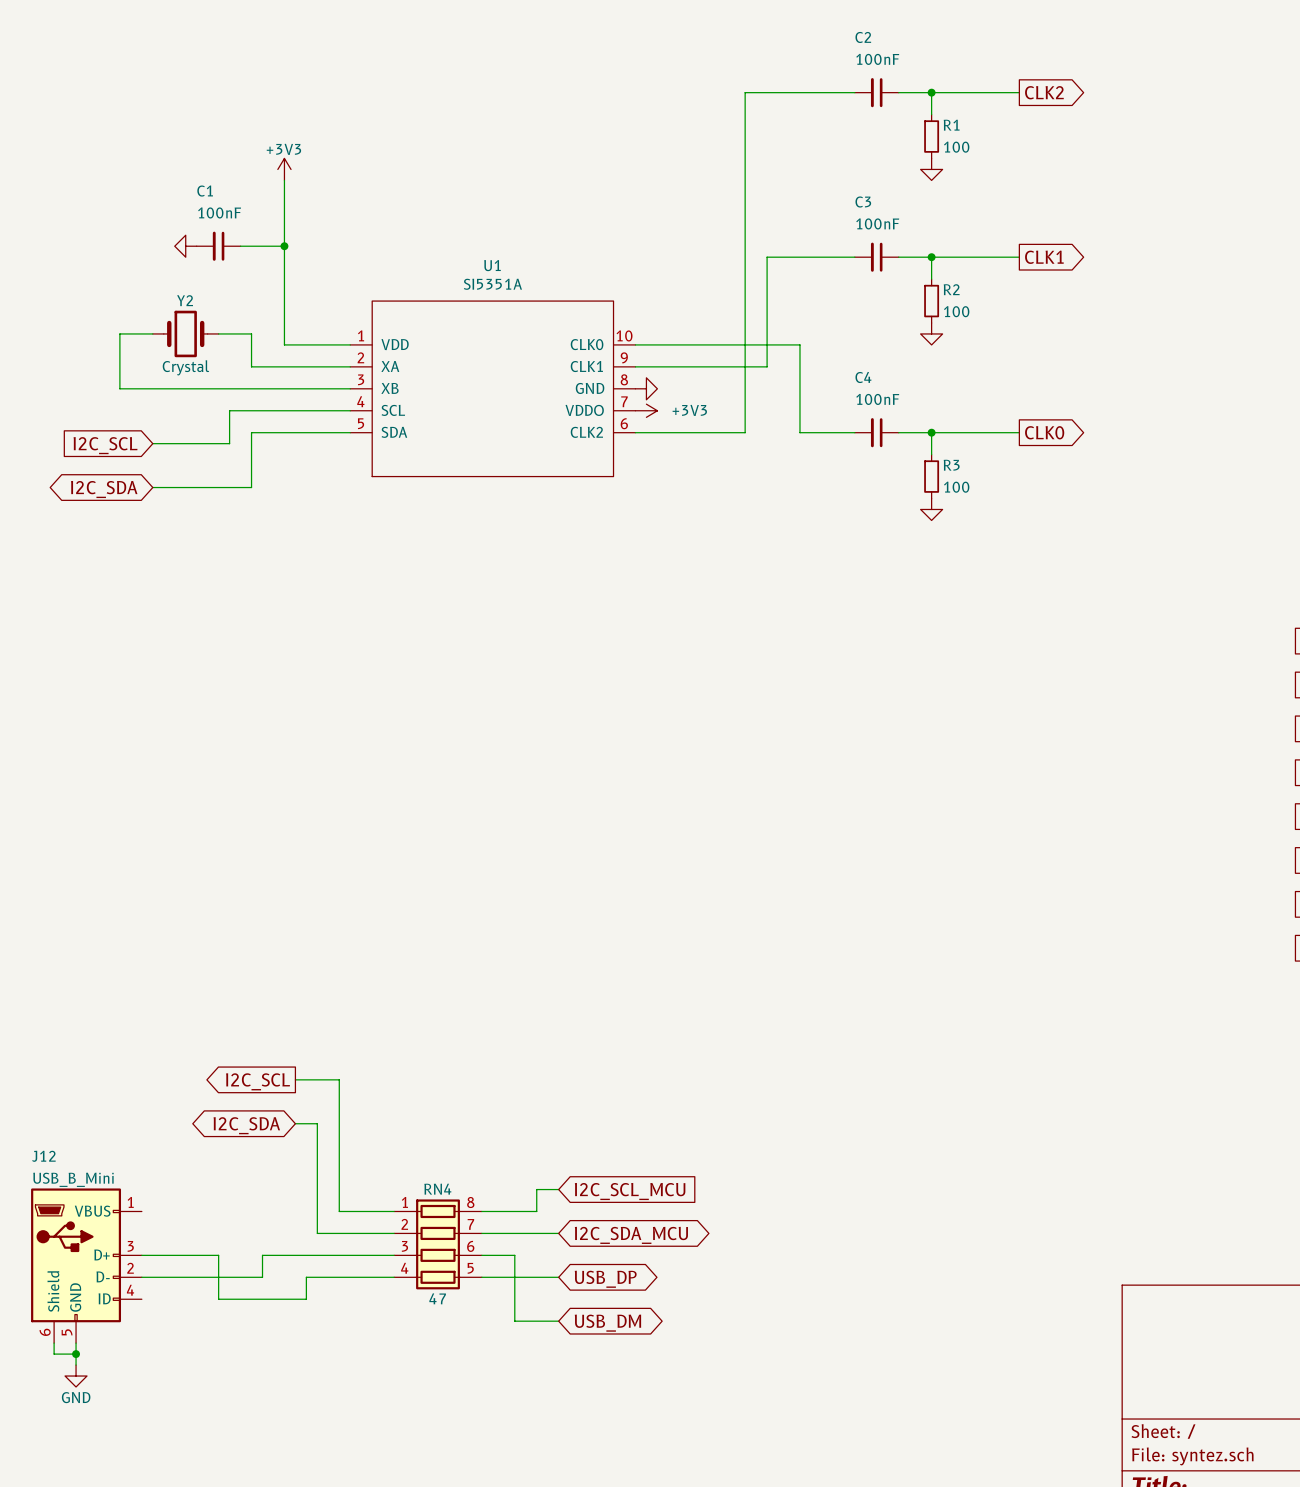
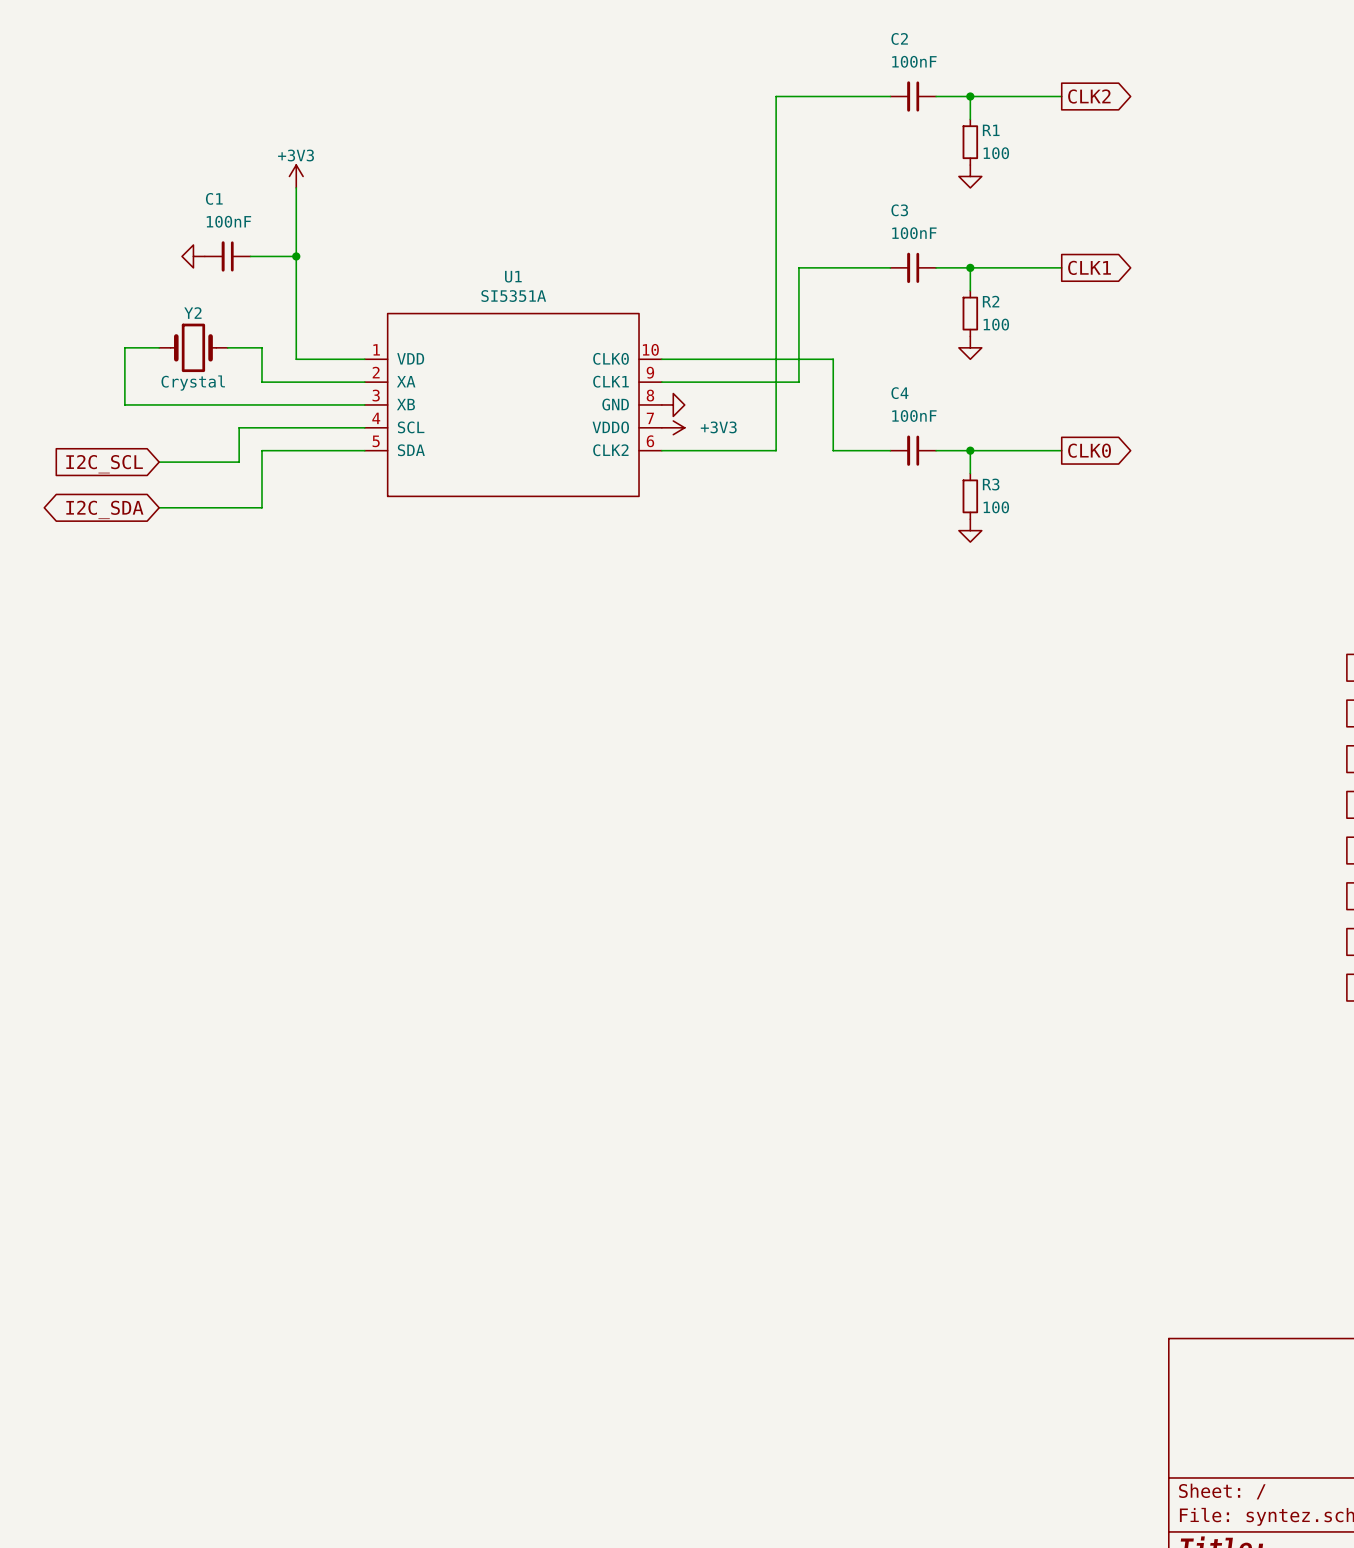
wire: (295, 1079) (339, 1079) (339, 1211) (394, 1211) -> none
global label: I2C_SCL (258, 1081) -> none
wire: (295, 1123) (317, 1123) (317, 1233) (394, 1233) -> none
global label: I2C_SDA (246, 1125) -> none
wire: (558, 1189) (536, 1189) (536, 1211) (481, 1211) -> none
global label: I2C_SCL_MCU (630, 1191) -> none
wire: (481, 1233) (558, 1233) -> none
global label: I2C_SDA_MCU (631, 1235) -> none
RN4: 47 (438, 1244) -> none
wire: (141, 1255) (218, 1255) (218, 1299) (306, 1299) (306, 1277) (394, 1277) -> none
wire: (394, 1255) (262, 1255) (262, 1277) (141, 1277) -> none
wire: (481, 1255) (514, 1255) (514, 1321) (558, 1321) -> none
J12: USB_B_Mini (86, 1265) -> none
wire: (481, 1277) (558, 1277) -> none
global label: USB_DP (605, 1279) -> none
global label: USB_DM (607, 1323) -> none
wire: (54, 1343) (54, 1354) (76, 1354) -> none
wire: (76, 1343) (76, 1365) -> none
junction: (76, 1354) -> none
power symbol: GND (76, 1376) -> none

